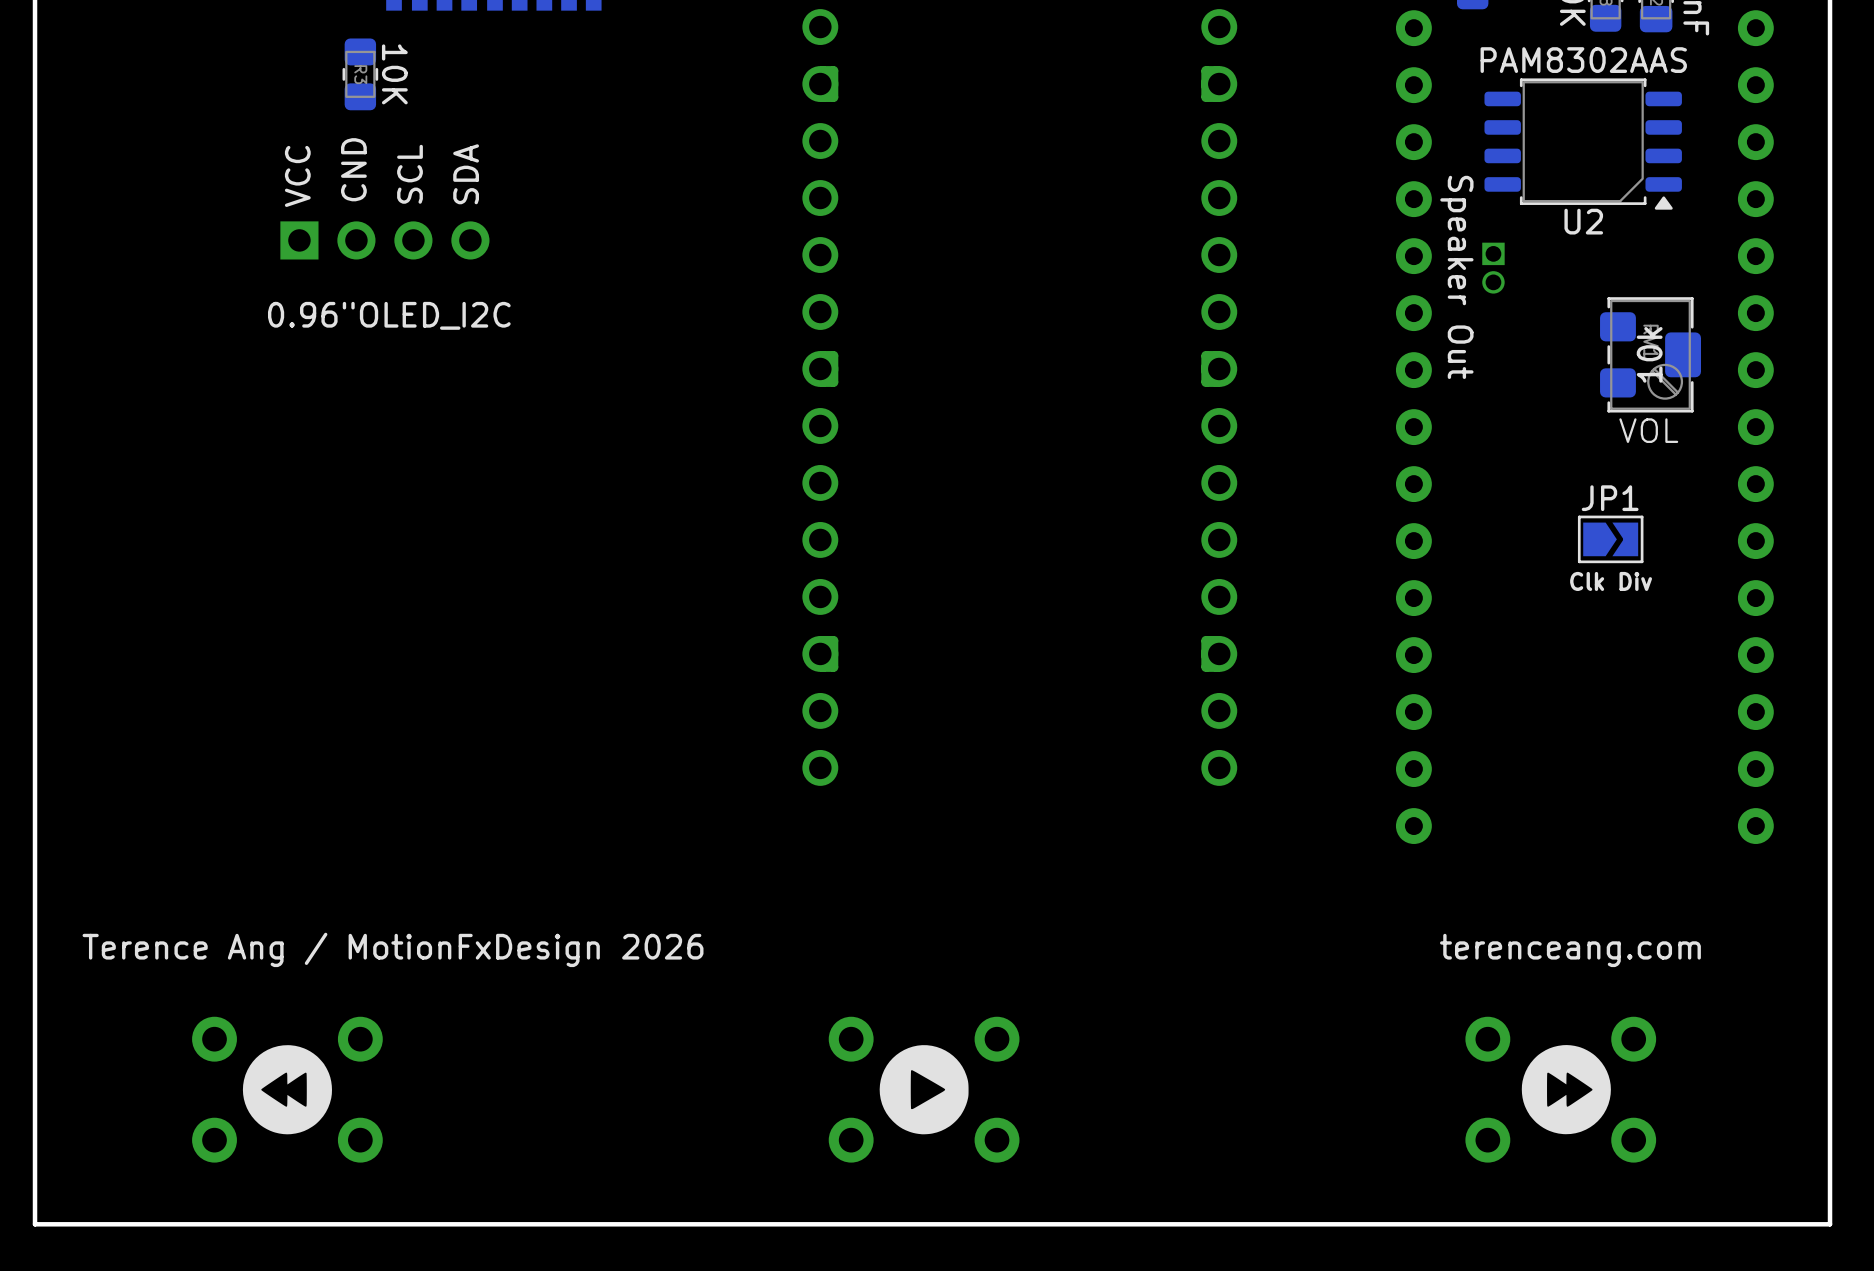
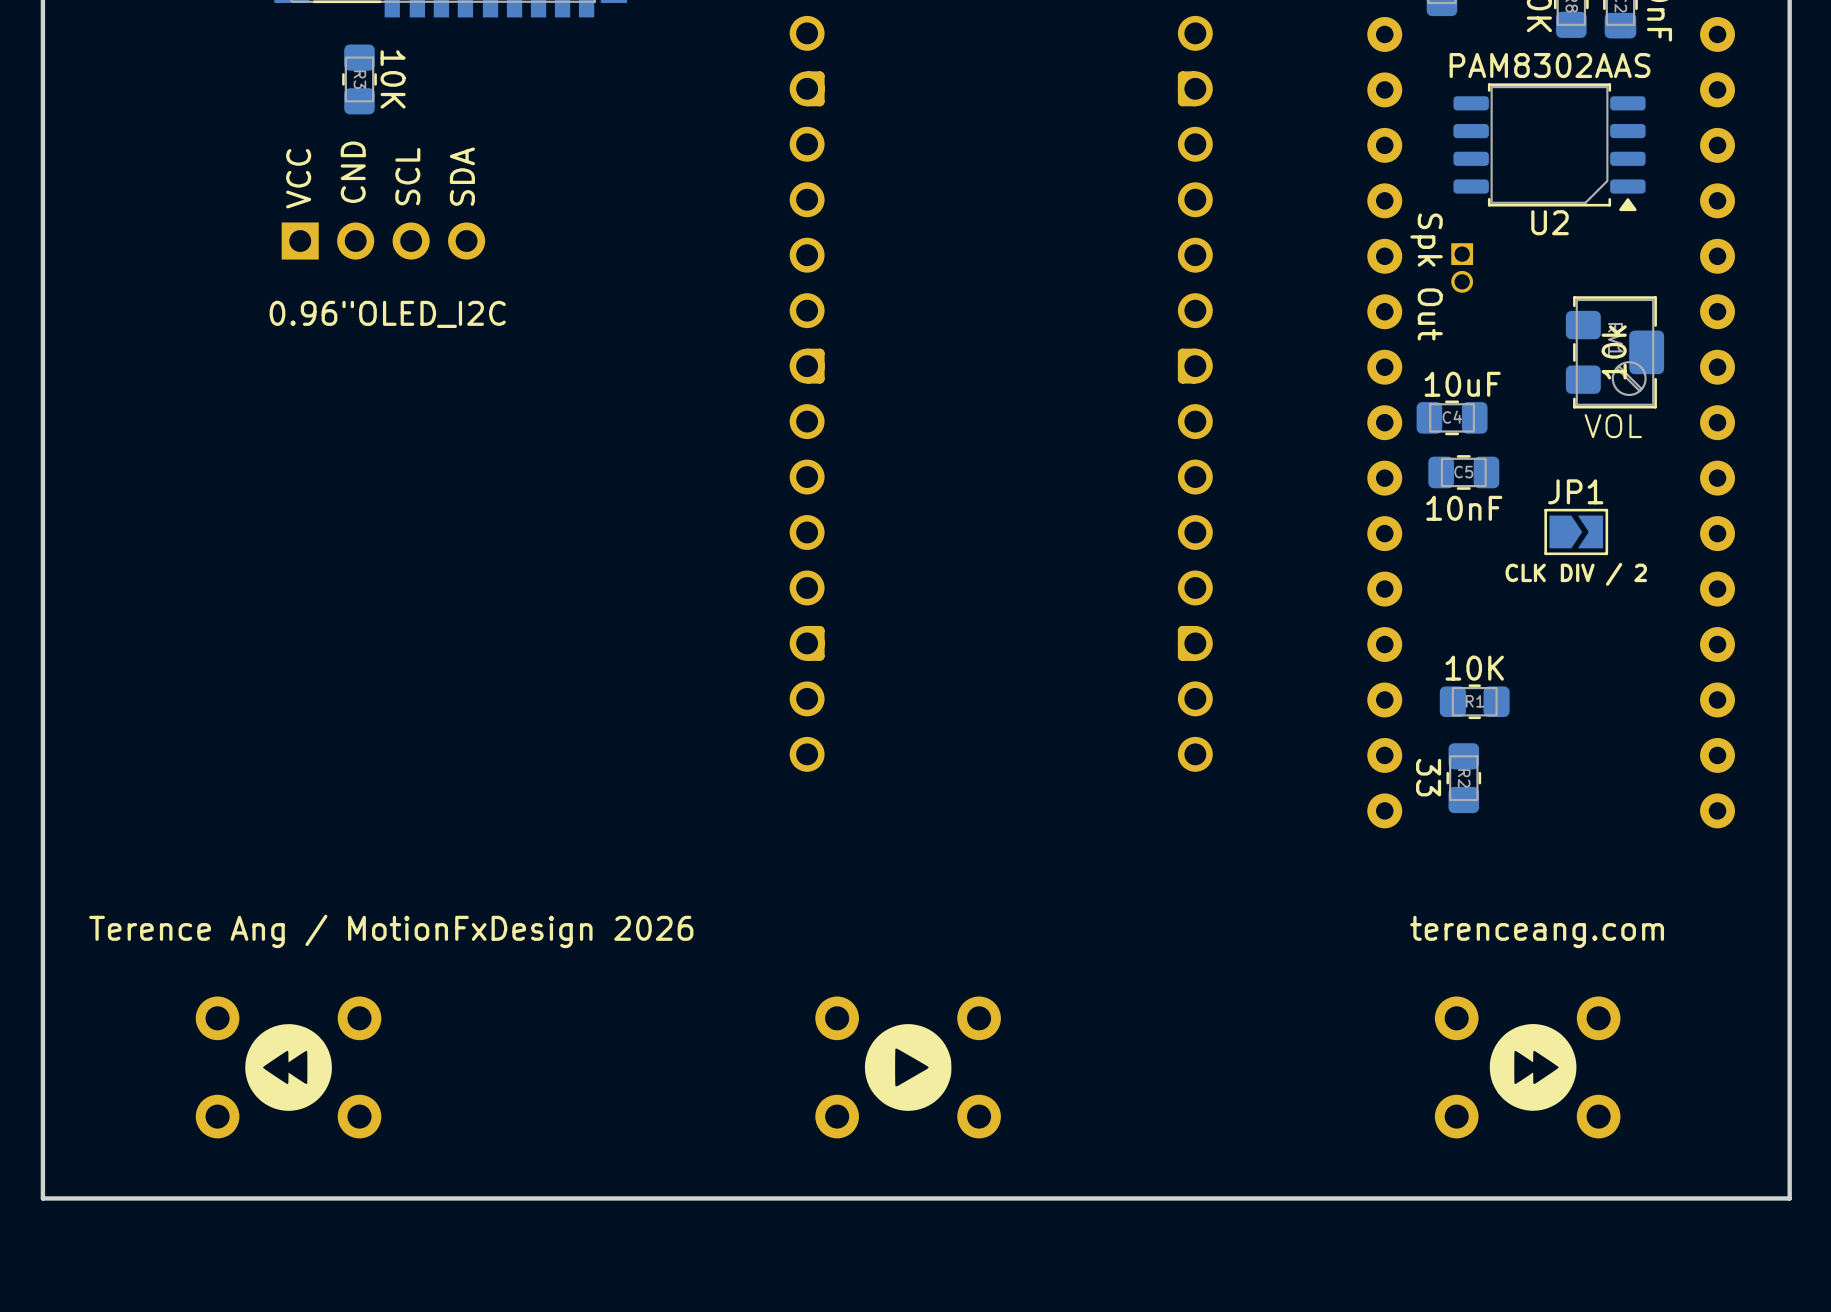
part value: Speaker Out (1456, 277) -> Spk Out (1426, 276)
C4: none -> 10uF (1452, 417)
C5: none -> 10nF (1463, 472)
JP1 value: Clk Div (1611, 581) -> CLK DIV / 2 (1576, 574)
R1: none -> 10K (1474, 701)
R2: none -> 33 (1463, 778)

